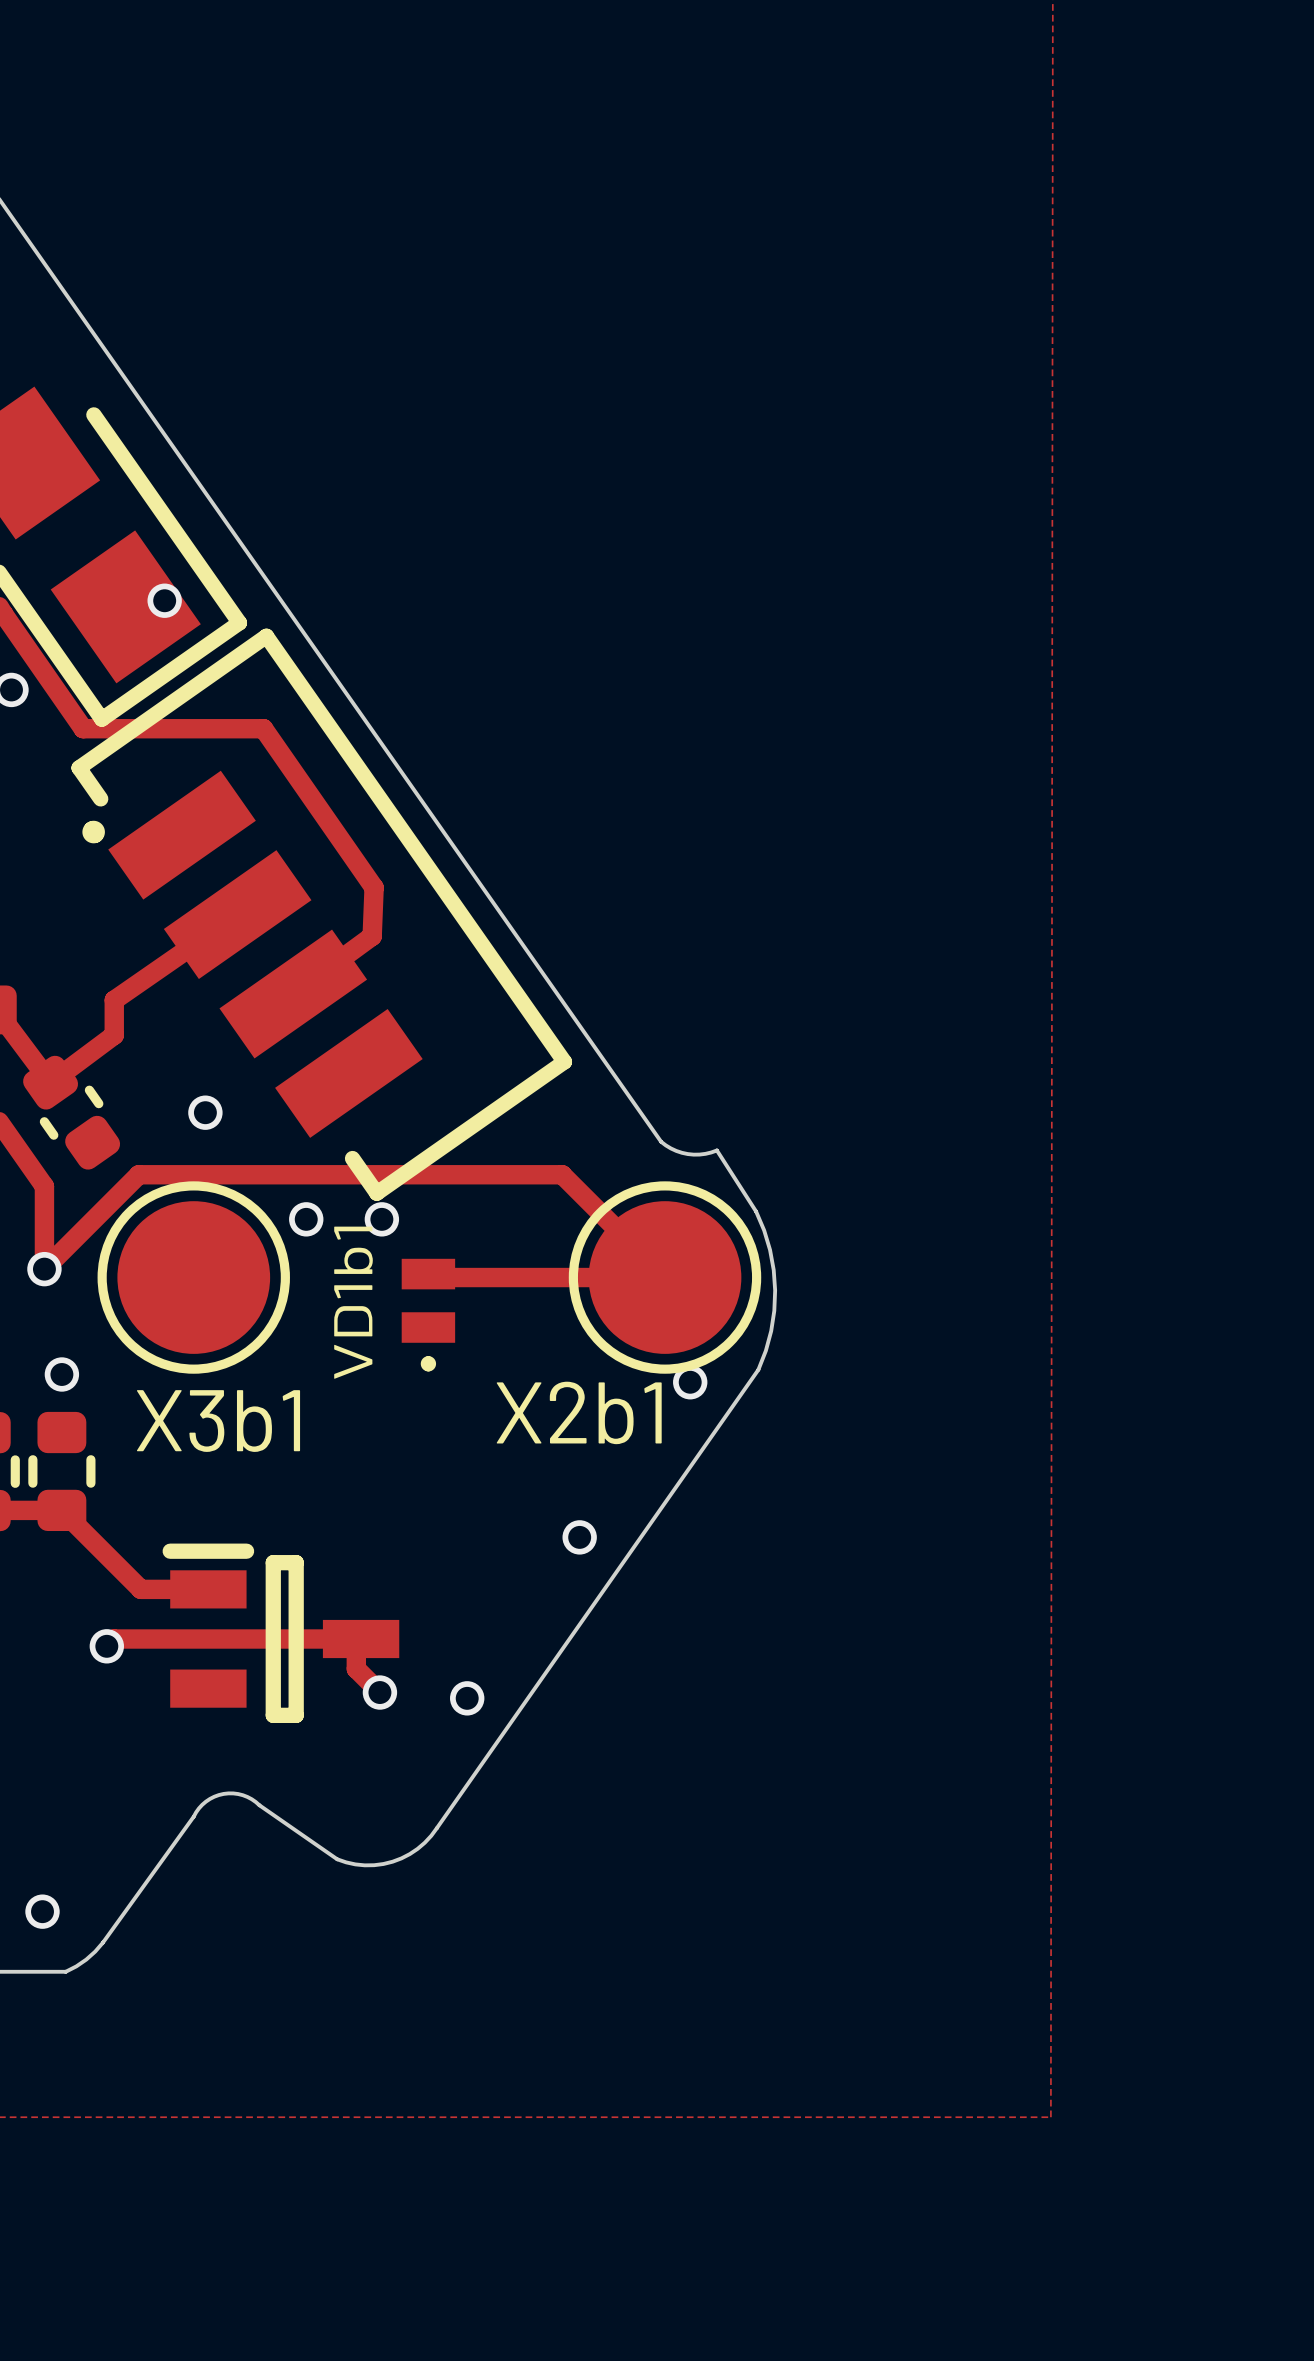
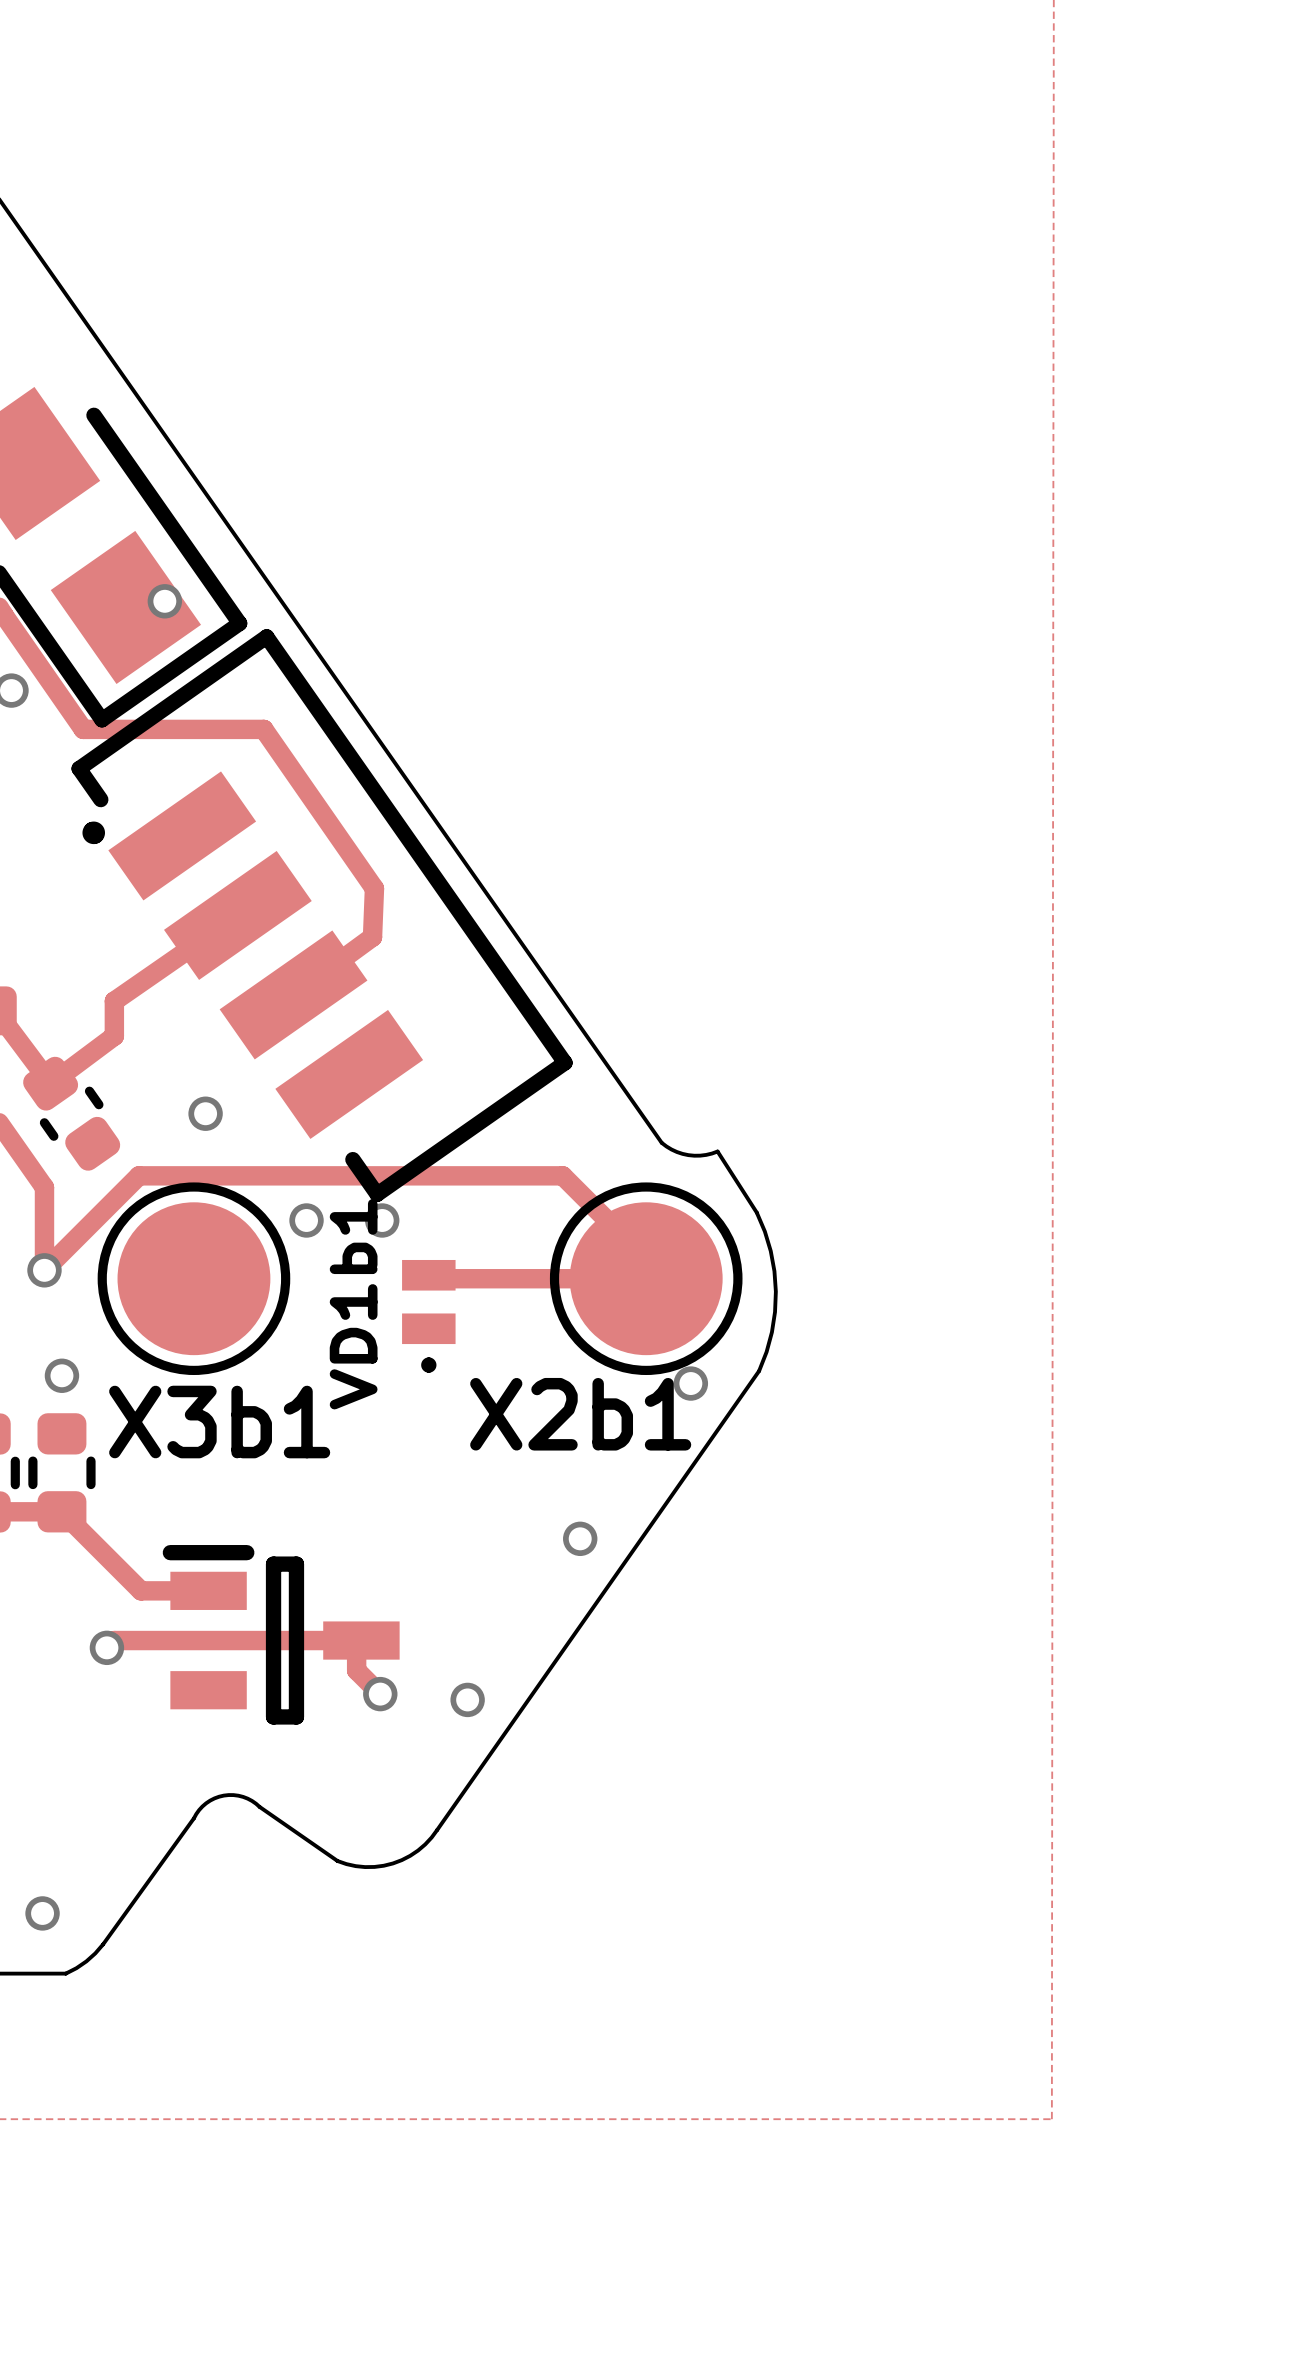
X2b1 position: (665, 1277) -> (646, 1278)

